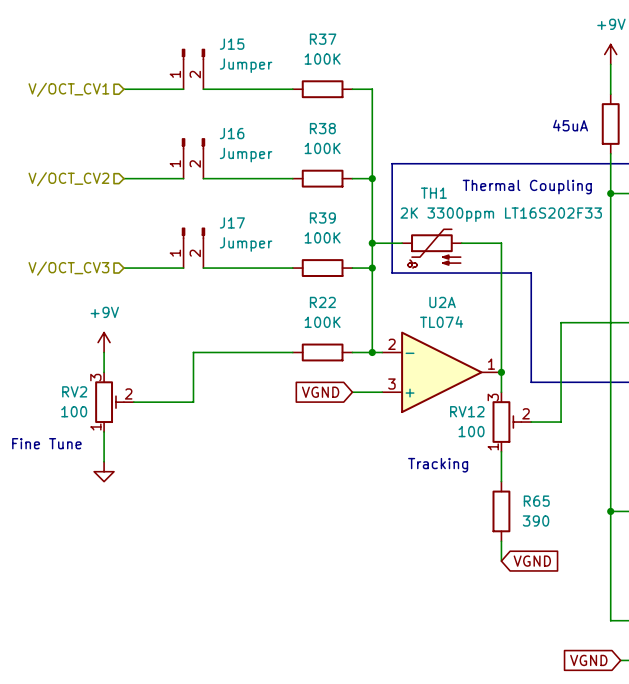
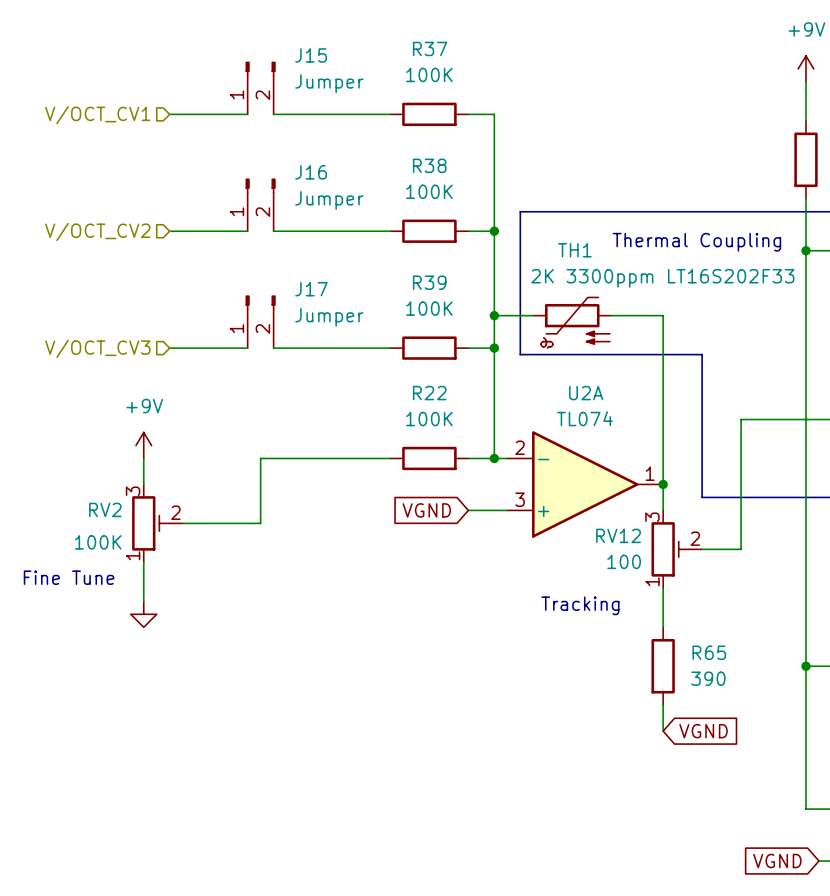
text: 45uA (570, 125) -> none
RV2 value: 100 (74, 411) -> 100K (98, 542)

